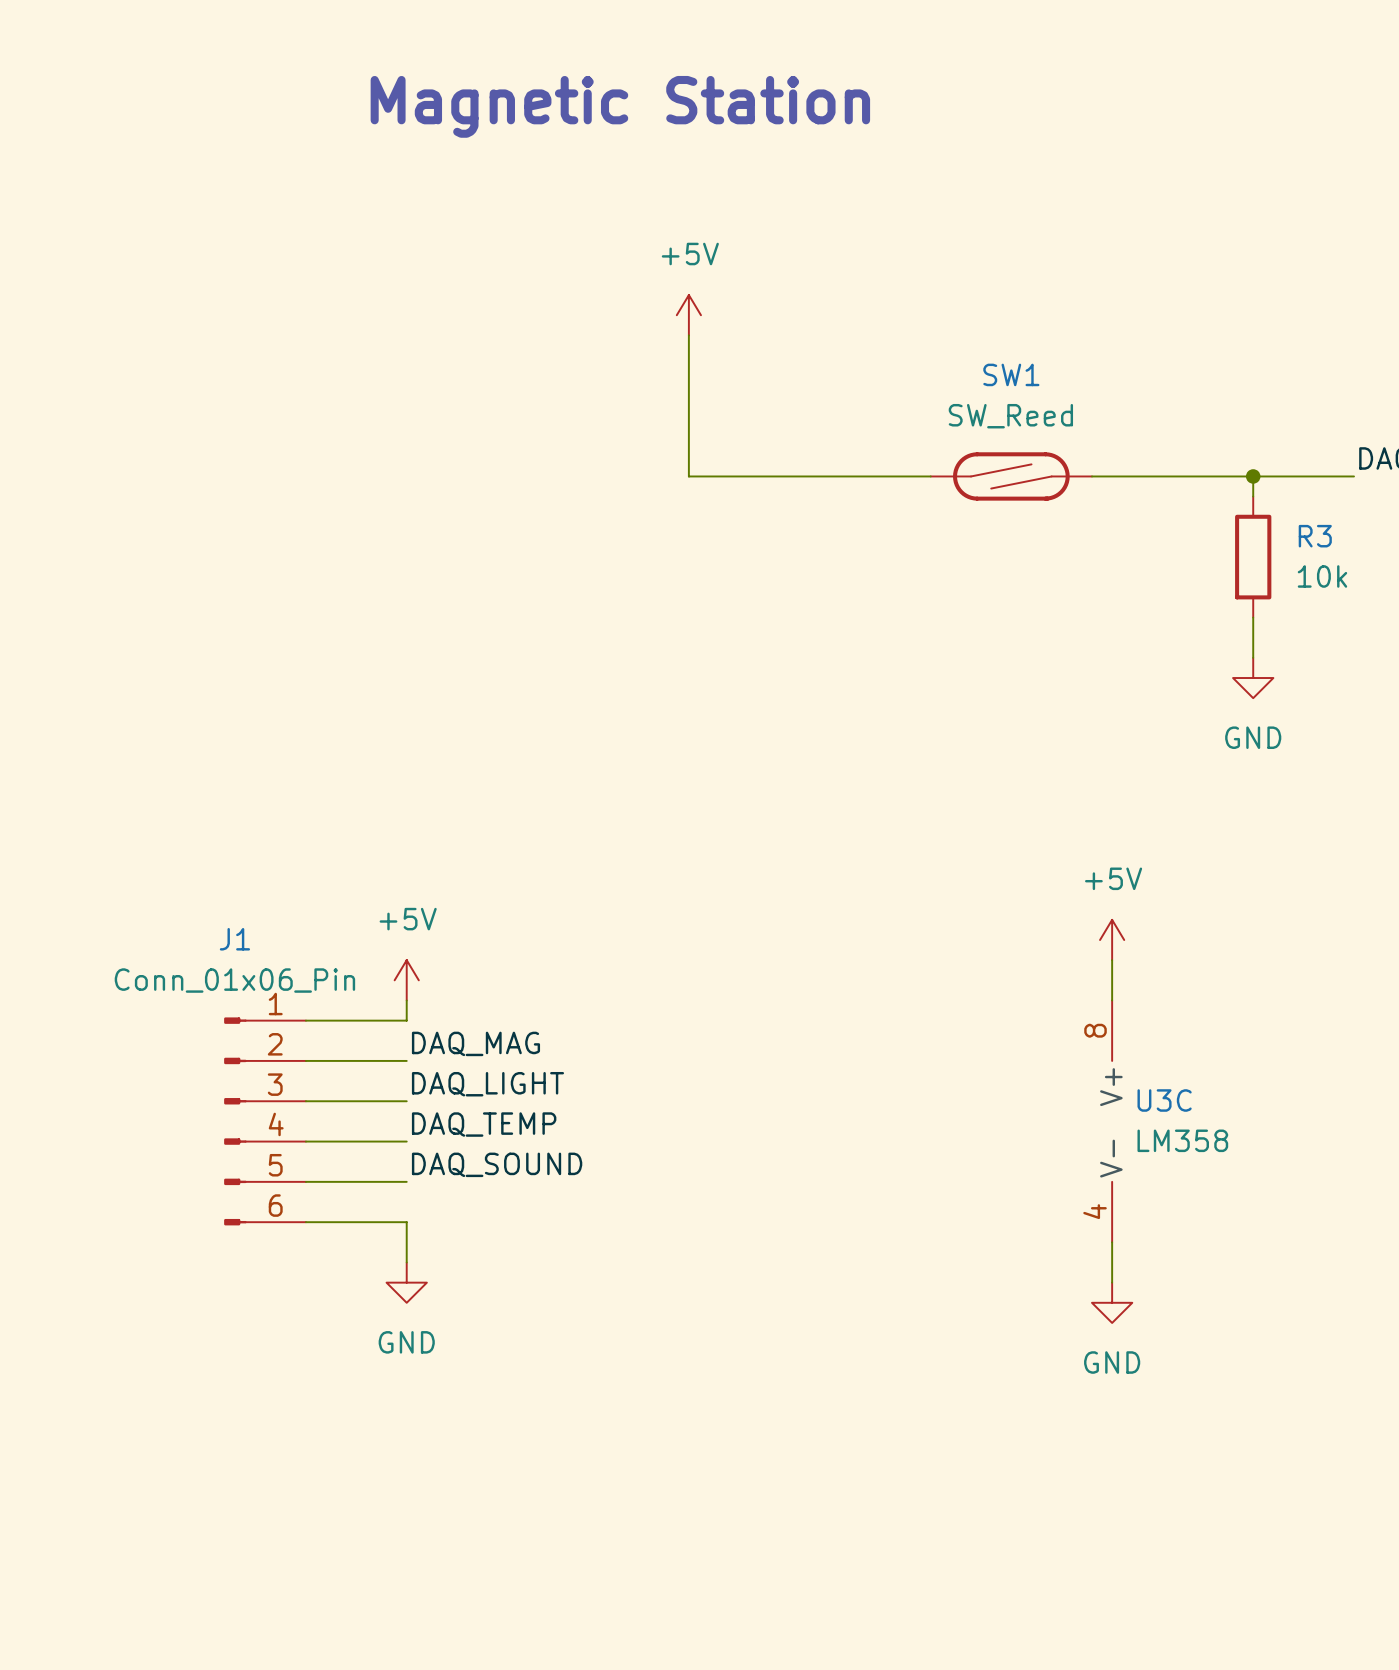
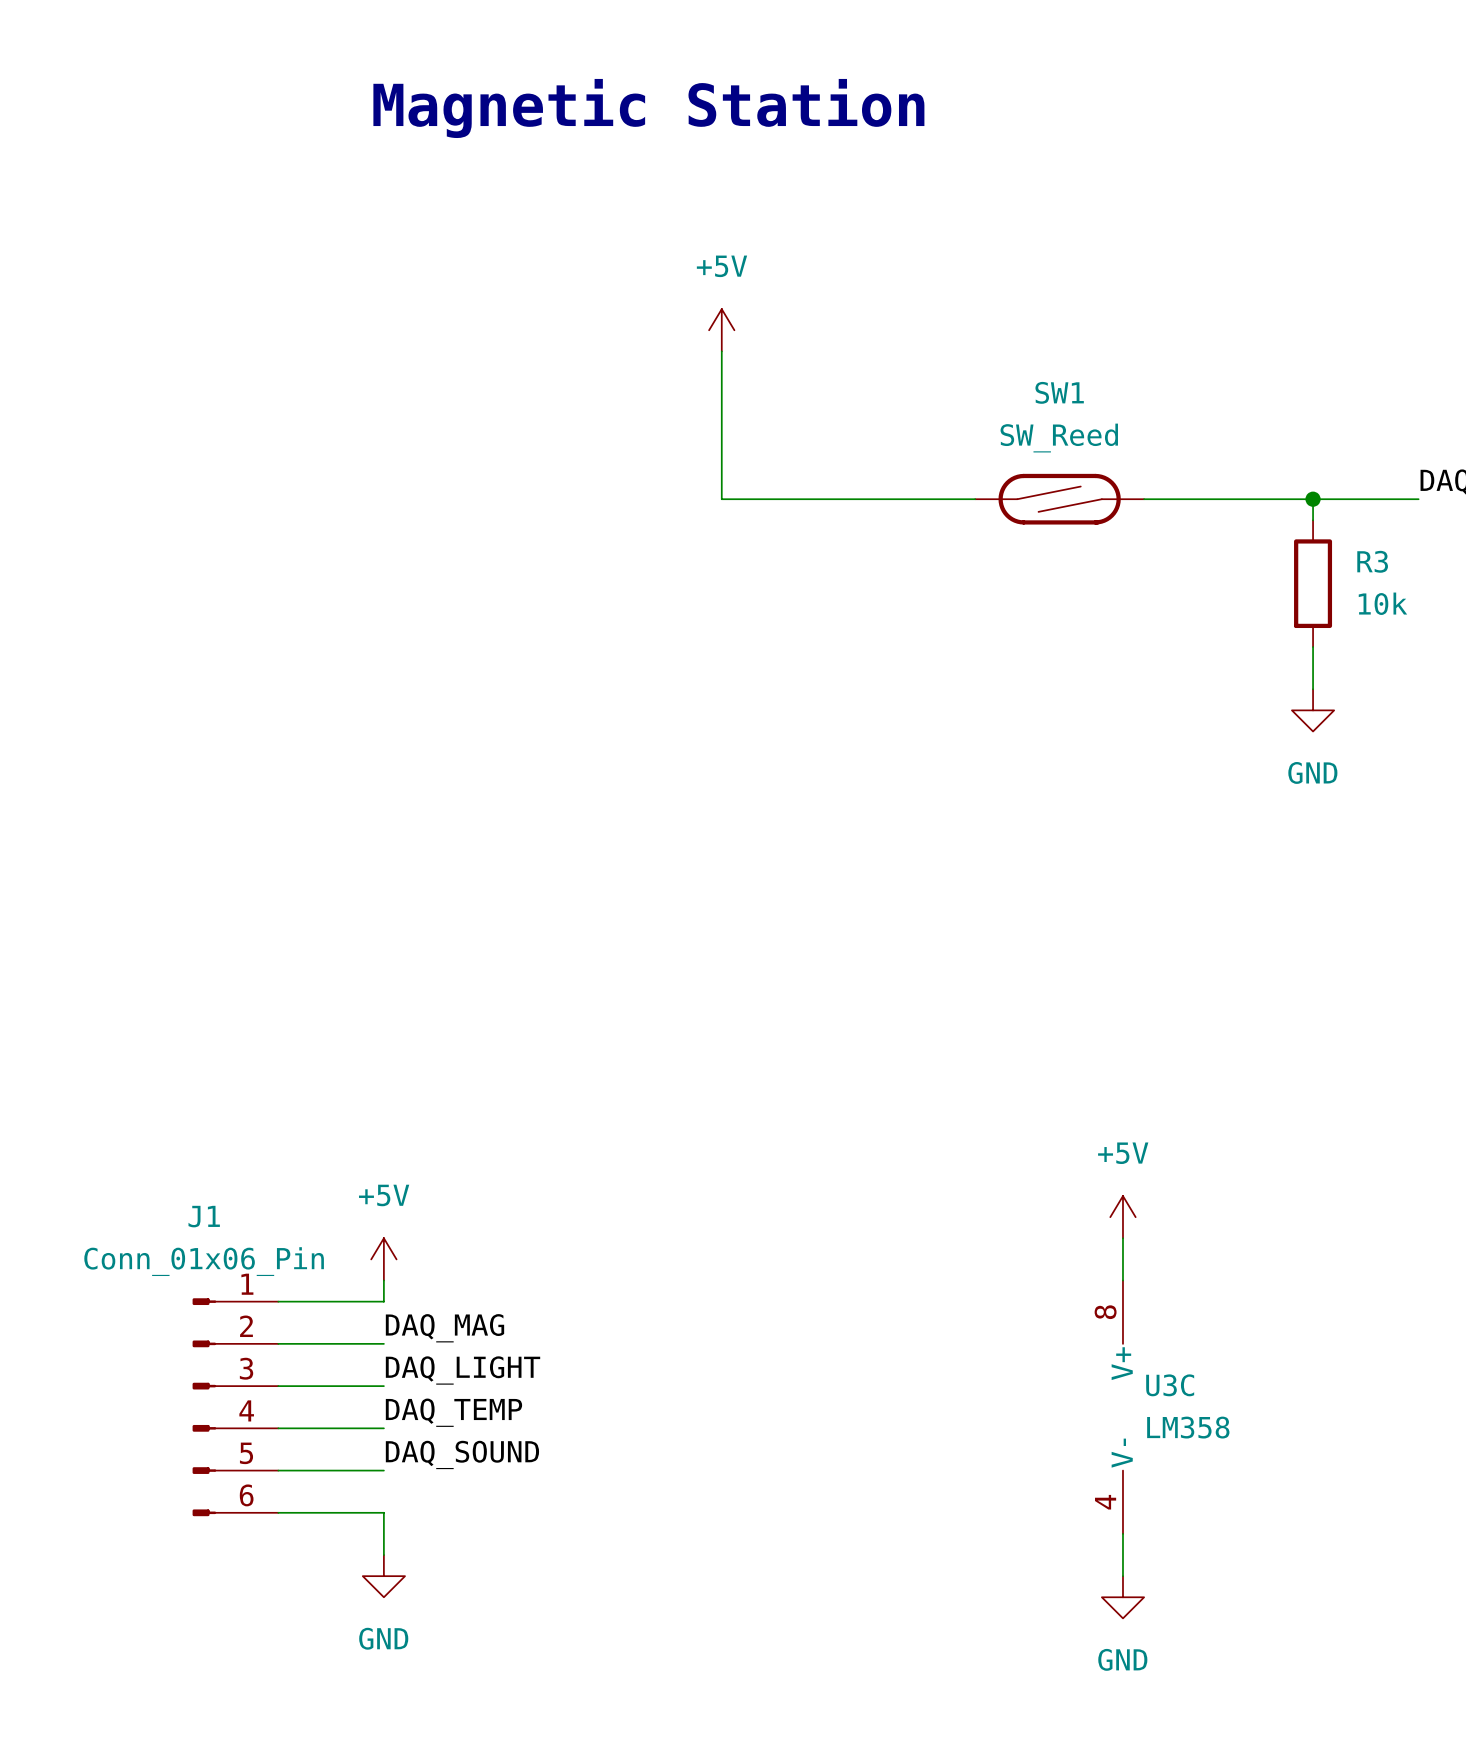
power symbol position: +5V (1112, 940) -> +5V (1122, 1217)
wire: (1112, 960) (1112, 1000) -> (1122, 1238) (1122, 1280)
power symbol position: +5V (406, 980) -> +5V (383, 1259)
wire: (406, 1000) (406, 1020) (305, 1020) -> (383, 1280) (383, 1301) (278, 1301)
label position: DAQ_MAG (475, 1043) -> DAQ_MAG (444, 1328)
wire: (305, 1060) (406, 1060) -> (278, 1343) (383, 1343)
label position: DAQ_LIGHT (487, 1084) -> DAQ_LIGHT (463, 1370)
wire: (305, 1101) (406, 1101) -> (278, 1386) (383, 1386)
J1 position: (265, 1121) -> (235, 1407)
U3C position: (1112, 1121) -> (1122, 1407)
label position: DAQ_TEMP (484, 1124) -> DAQ_TEMP (453, 1412)
wire: (305, 1141) (406, 1141) -> (278, 1428) (383, 1428)
label position: DAQ_SOUND (497, 1164) -> DAQ_SOUND (462, 1454)
wire: (305, 1181) (406, 1181) -> (278, 1470) (383, 1470)
wire: (305, 1222) (406, 1222) (406, 1262) -> (278, 1512) (383, 1512) (383, 1555)
wire: (1112, 1242) (1112, 1282) -> (1122, 1533) (1122, 1576)
power symbol position: GND (406, 1282) -> GND (383, 1576)
power symbol position: GND (1112, 1302) -> GND (1122, 1597)

